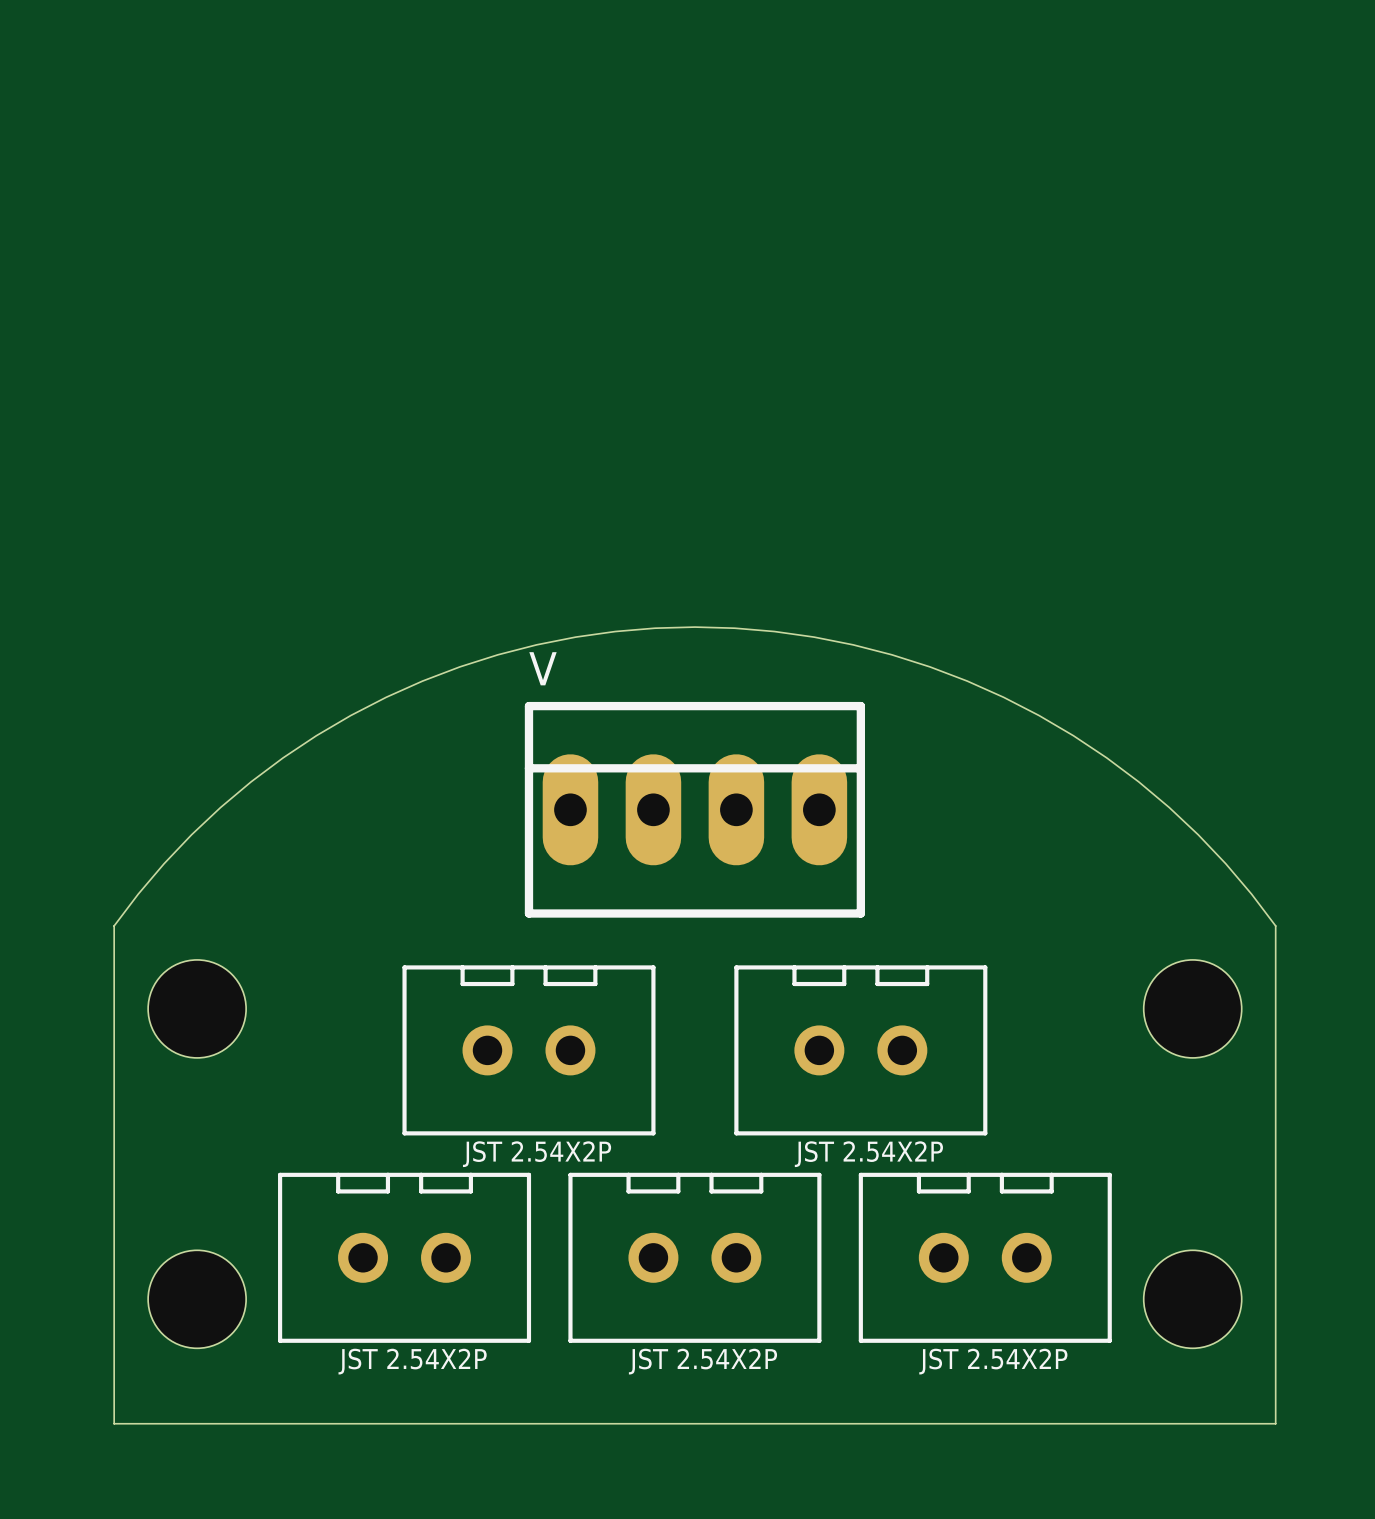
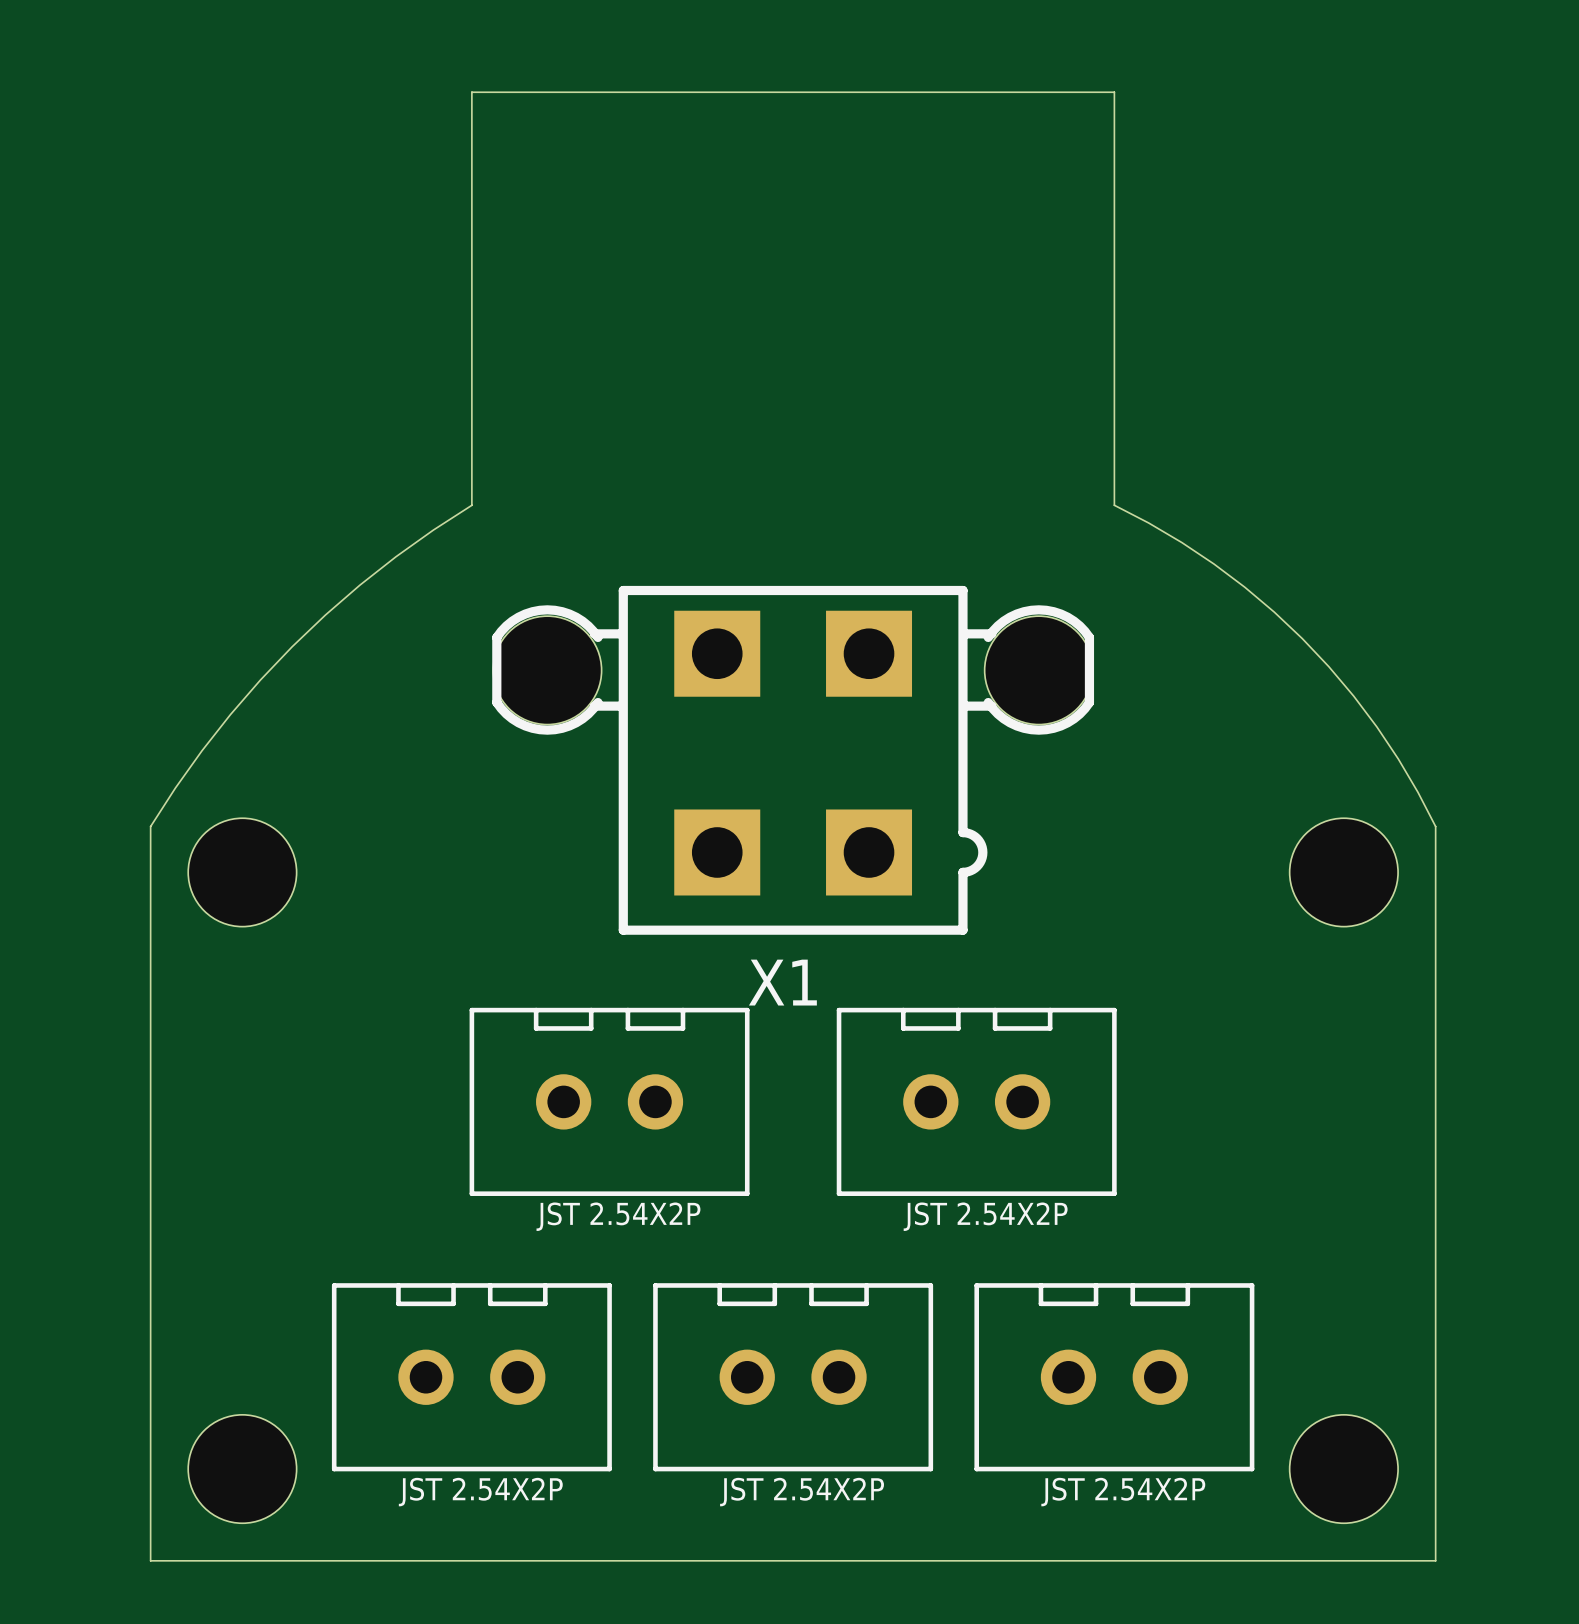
X1: none -> (793, 760)
hole: none -> (242, 872)
hole: none -> (1343, 872)
V: (694, 809) -> none
board edge: (114, 925) (164, 863) (220, 807) (283, 757) (350, 715) (422, 681) (459, 666) (536, 644) (615, 631) (694, 627) (774, 631) (853, 644) (929, 666) (967, 681) (1039, 715) (1106, 757) (1169, 807) (1225, 863) (1275, 925) -> (150, 1010) (150, 826) (202, 750) (260, 679) (292, 646) (325, 615) (396, 556) (471, 505) (471, 92) (1114, 92) (1114, 505) (1181, 542) (1213, 564) (1274, 612) (1328, 666) (1376, 726) (1398, 759) (1435, 826) (1435, 1010)
hole: (197, 1008) -> none
hole: (1192, 1008) -> none
part position: (528, 1050) -> (609, 1101)
part position: (860, 1050) -> (976, 1101)
hole position: (197, 1299) -> (242, 1469)
hole position: (1192, 1299) -> (1343, 1469)

